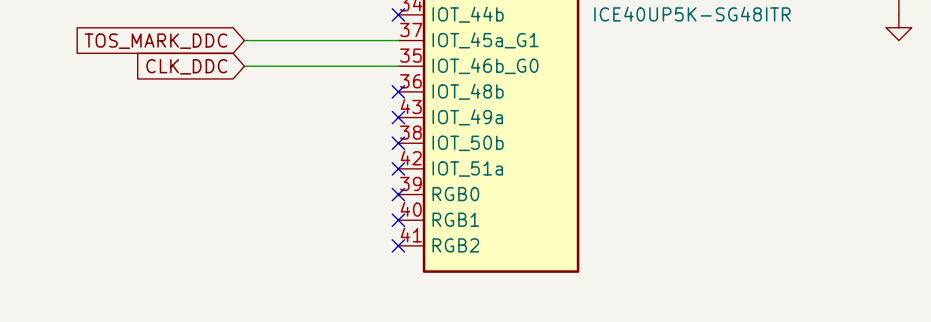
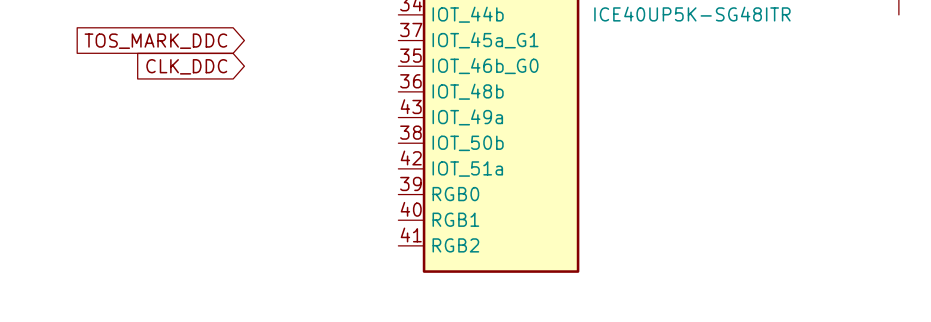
no-connect mark: (398, 14) -> none
power symbol: (898, 27) -> none
wire: (244, 40) (398, 40) -> none
wire: (244, 66) (398, 66) -> none
no-connect mark: (398, 91) -> none
no-connect mark: (398, 117) -> none
no-connect mark: (398, 143) -> none
no-connect mark: (398, 168) -> none
no-connect mark: (398, 194) -> none
no-connect mark: (398, 220) -> none
no-connect mark: (398, 245) -> none

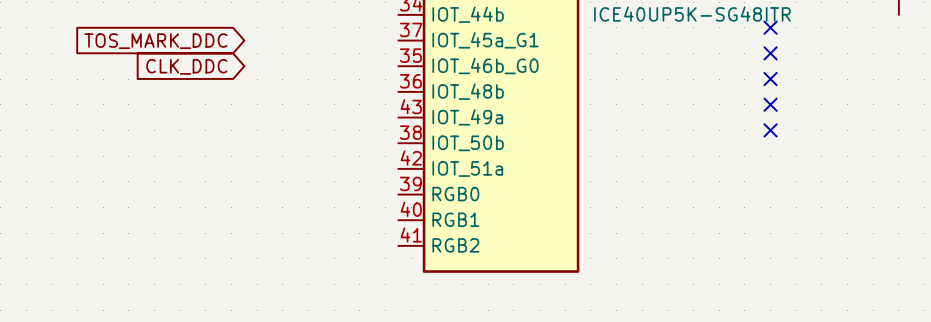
no-connect mark: none -> (770, 27)
no-connect mark: none -> (770, 53)
no-connect mark: none -> (770, 79)
no-connect mark: none -> (770, 104)
no-connect mark: none -> (770, 130)

